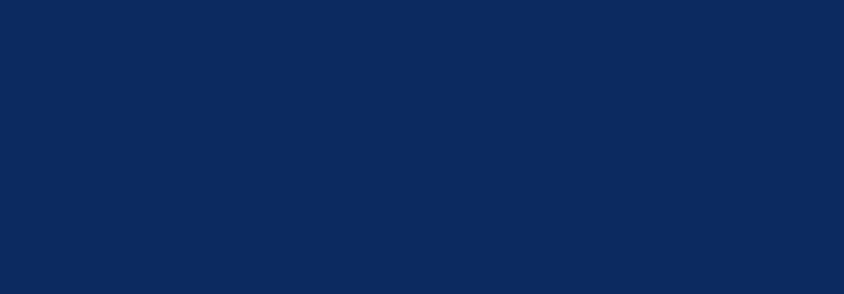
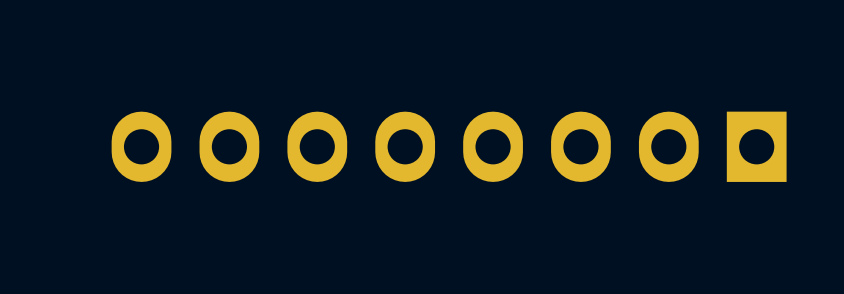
part: none -> (449, 146)

